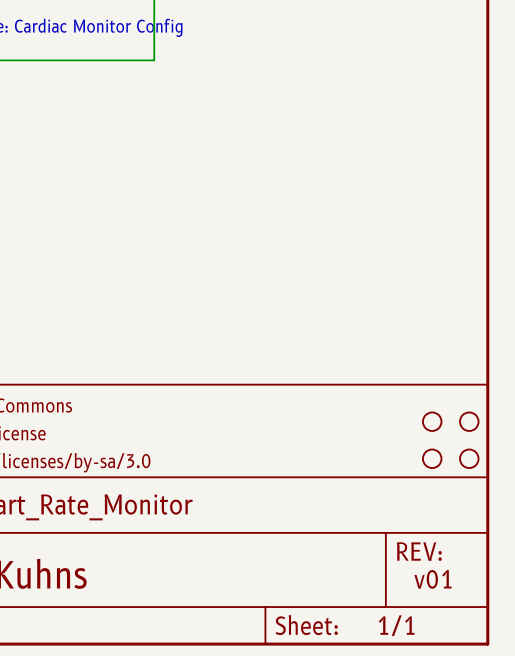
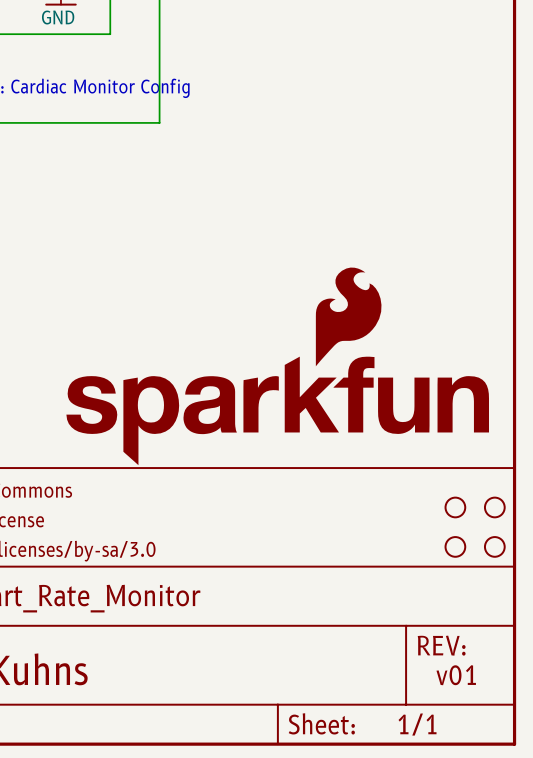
part: none -> (277, 366)

